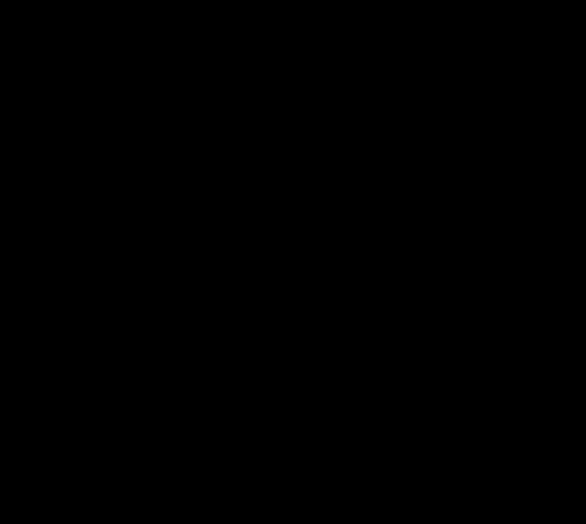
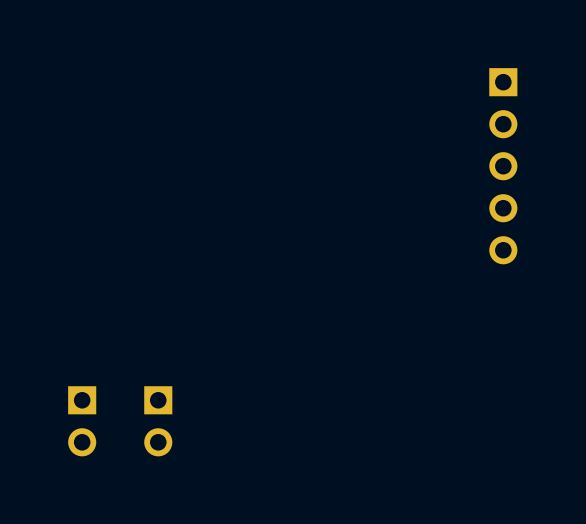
part: none -> (503, 166)
part: none -> (82, 421)
part: none -> (158, 421)

